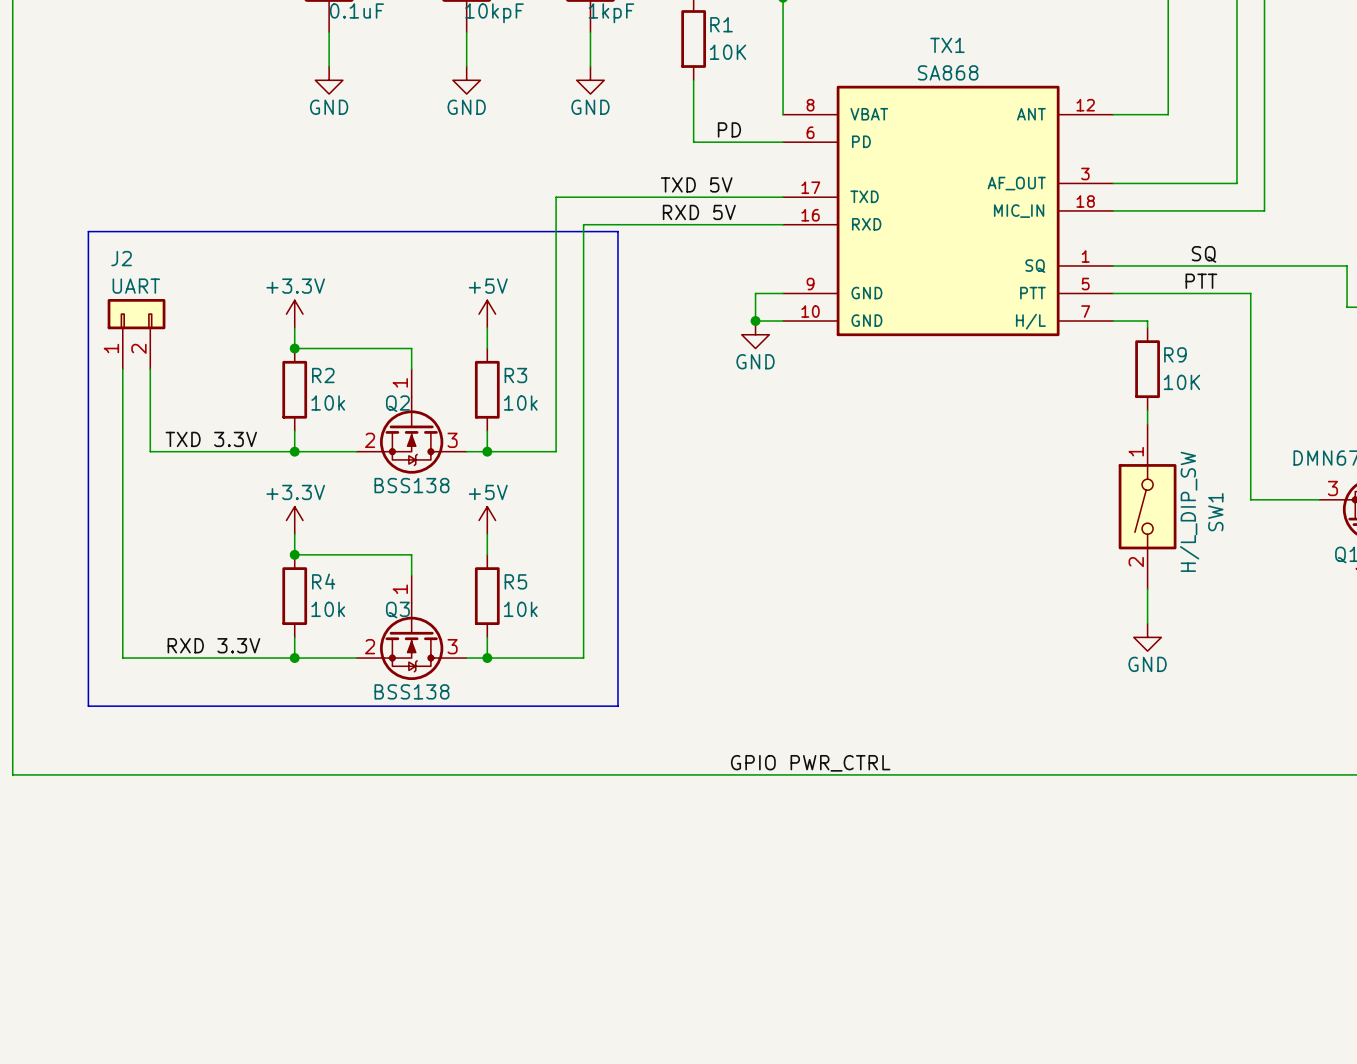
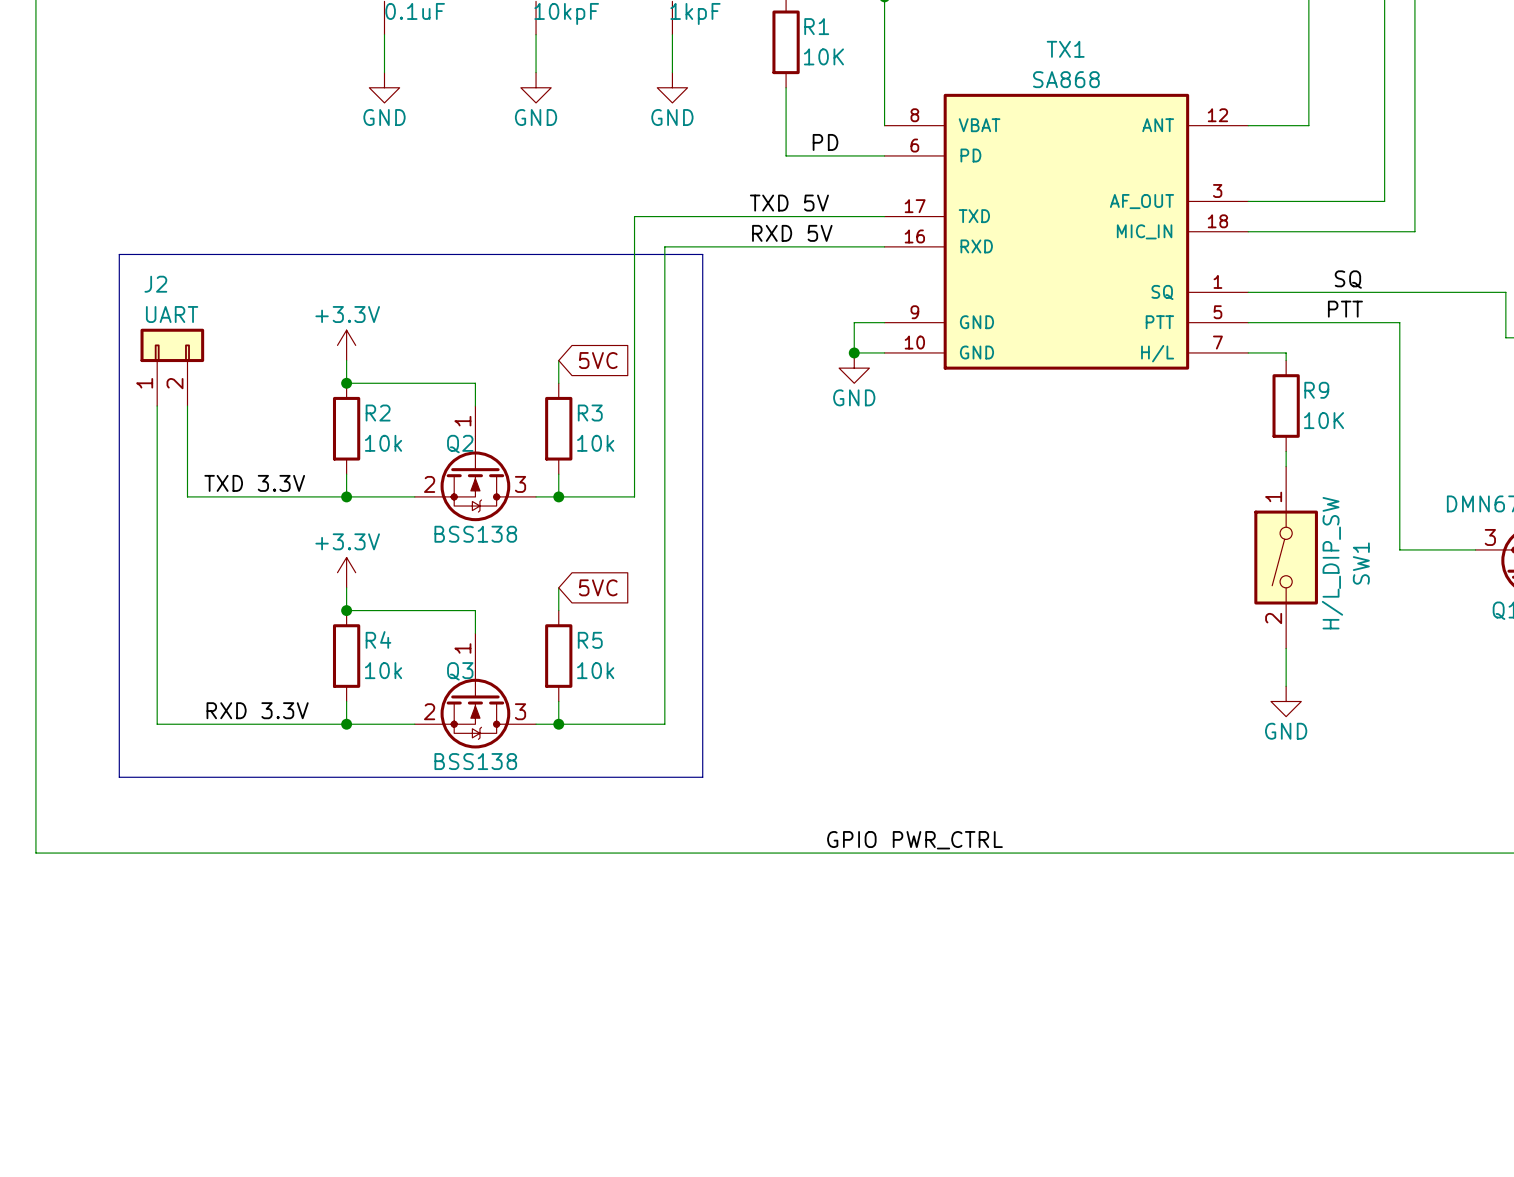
power symbol: +5V (487, 314) -> none
global label: none -> 5VC (598, 360)
power symbol: +5V (487, 520) -> none
global label: none -> 5VC (598, 587)

